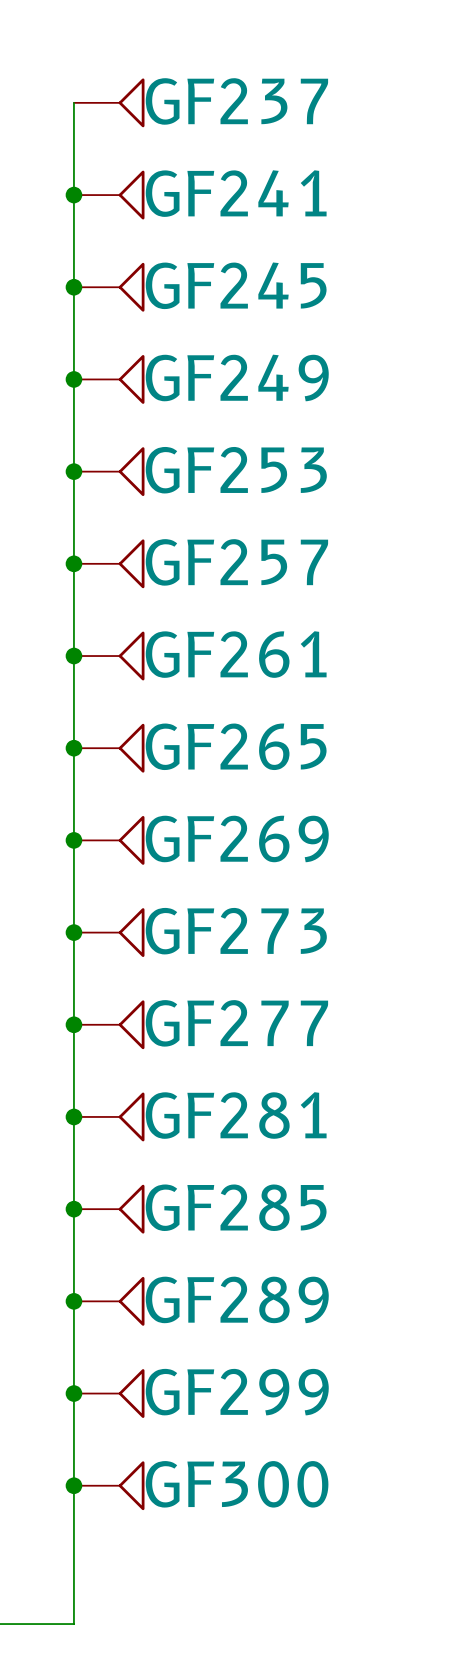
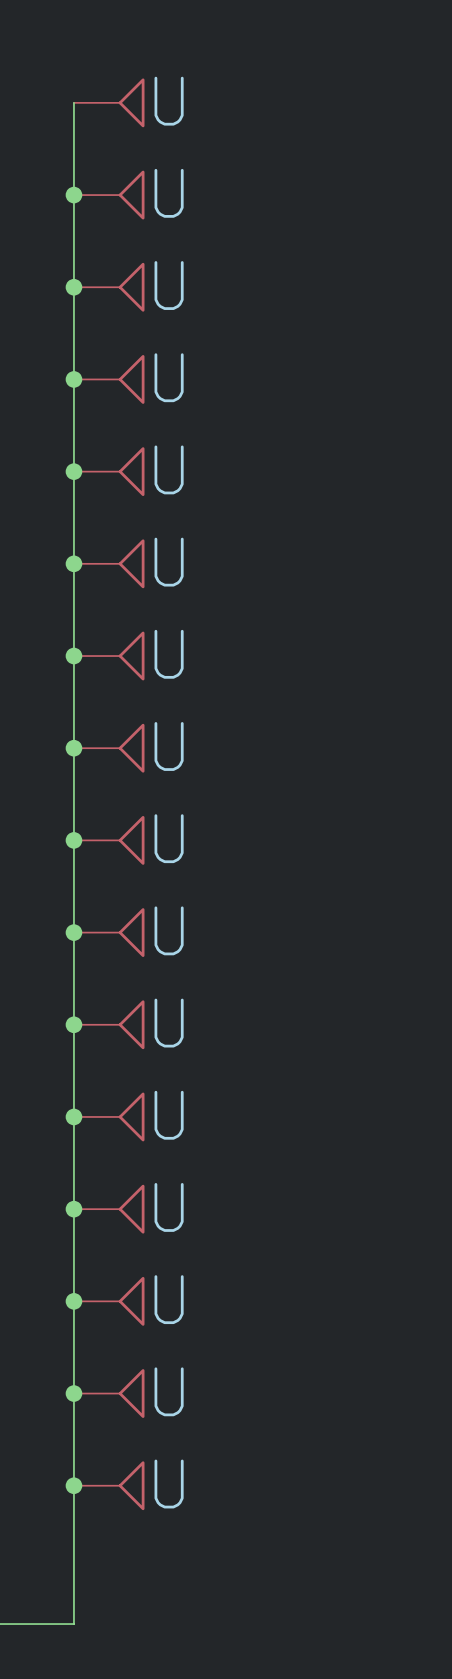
GF237 name: GF237 (236, 101) -> U (169, 101)
GF241 name: GF241 (236, 193) -> U (169, 193)
GF245 name: GF245 (236, 285) -> U (169, 285)
GF249 name: GF249 (237, 377) -> U (169, 377)
GF253 name: GF253 (236, 470) -> U (169, 469)
GF257 name: GF257 (236, 562) -> U (169, 562)
GF261 name: GF261 (236, 654) -> U (169, 654)
GF265 name: GF265 (236, 746) -> U (169, 746)
GF269 name: GF269 (237, 838) -> U (169, 838)
GF273 name: GF273 (236, 931) -> U (169, 930)
GF277 name: GF277 (236, 1023) -> U (169, 1023)
GF281 name: GF281 (236, 1115) -> U (169, 1115)
GF285 name: GF285 (236, 1207) -> U (169, 1207)
GF289 name: GF289 (237, 1299) -> U (169, 1299)
GF299 name: GF299 (237, 1392) -> U (169, 1391)
GF300 name: GF300 (237, 1484) -> U (169, 1484)

